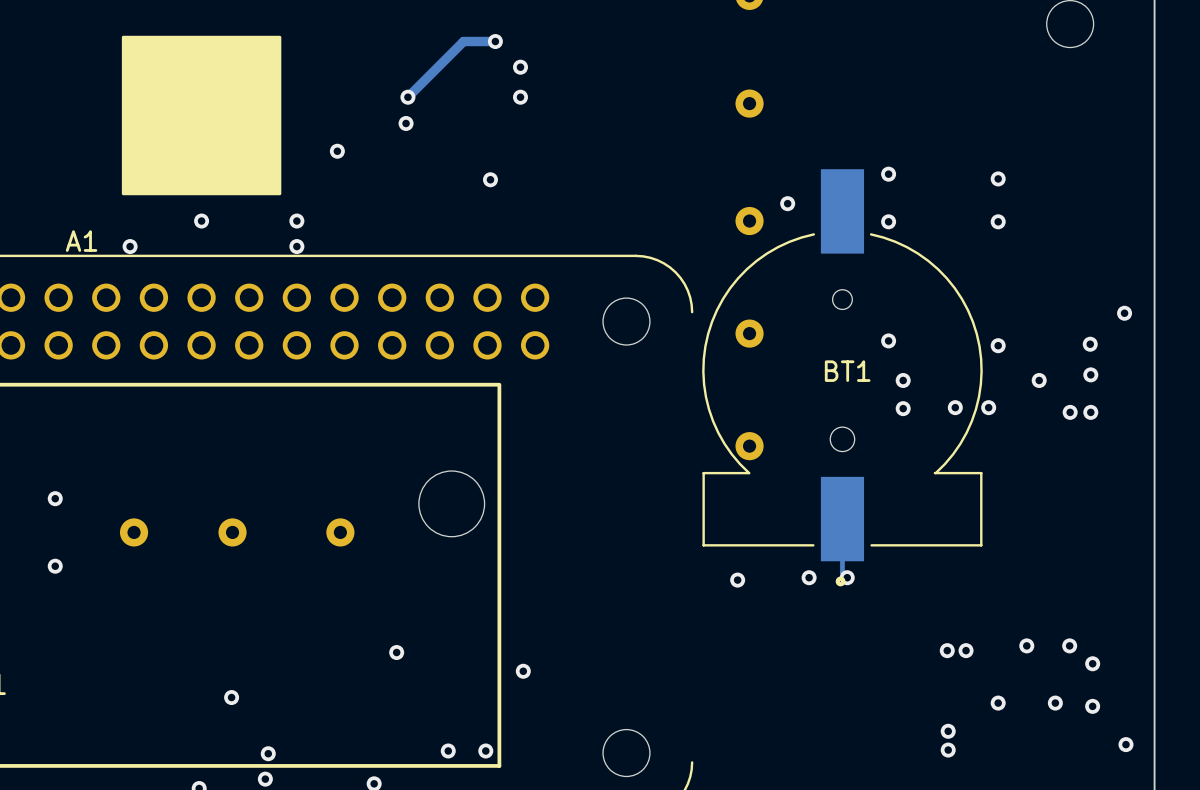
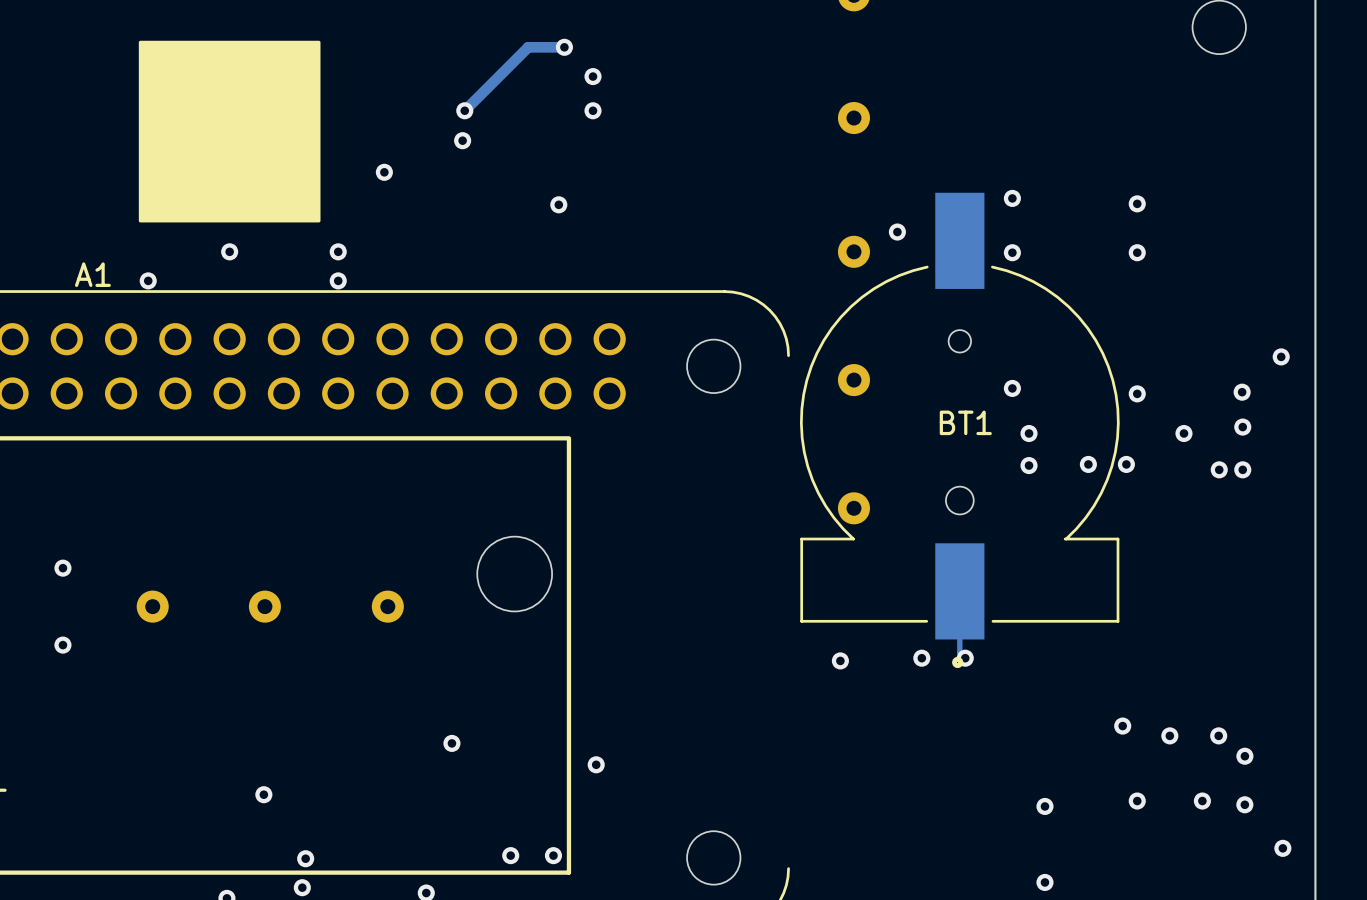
via: none -> (1122, 726)
via: (947, 650) -> none
via: (966, 650) -> none
via: none -> (1044, 806)
via: (948, 731) -> none
via: (948, 750) -> none
via: none -> (1044, 882)

